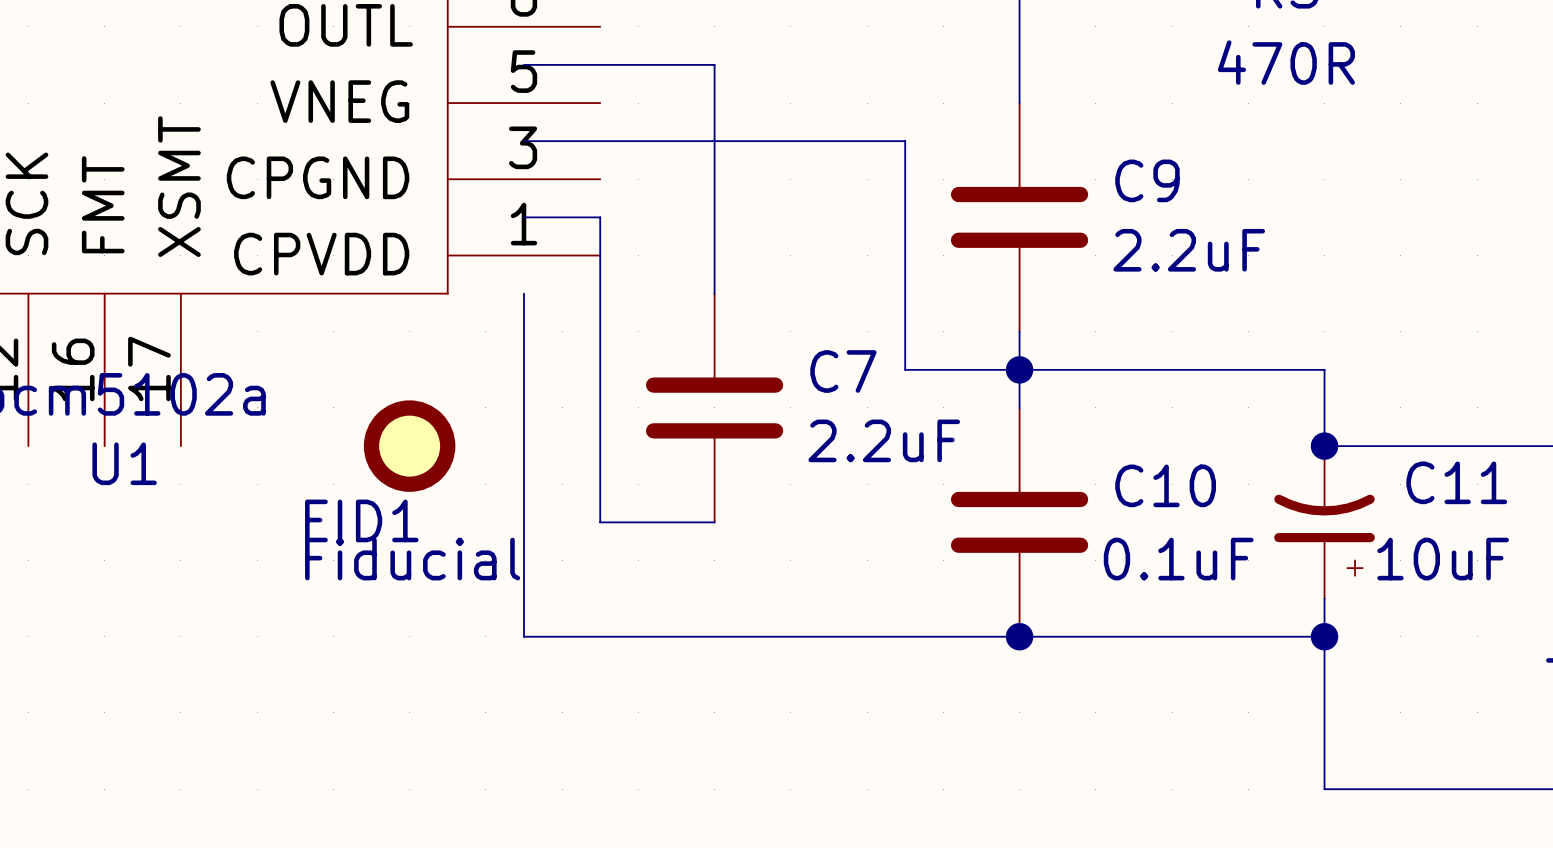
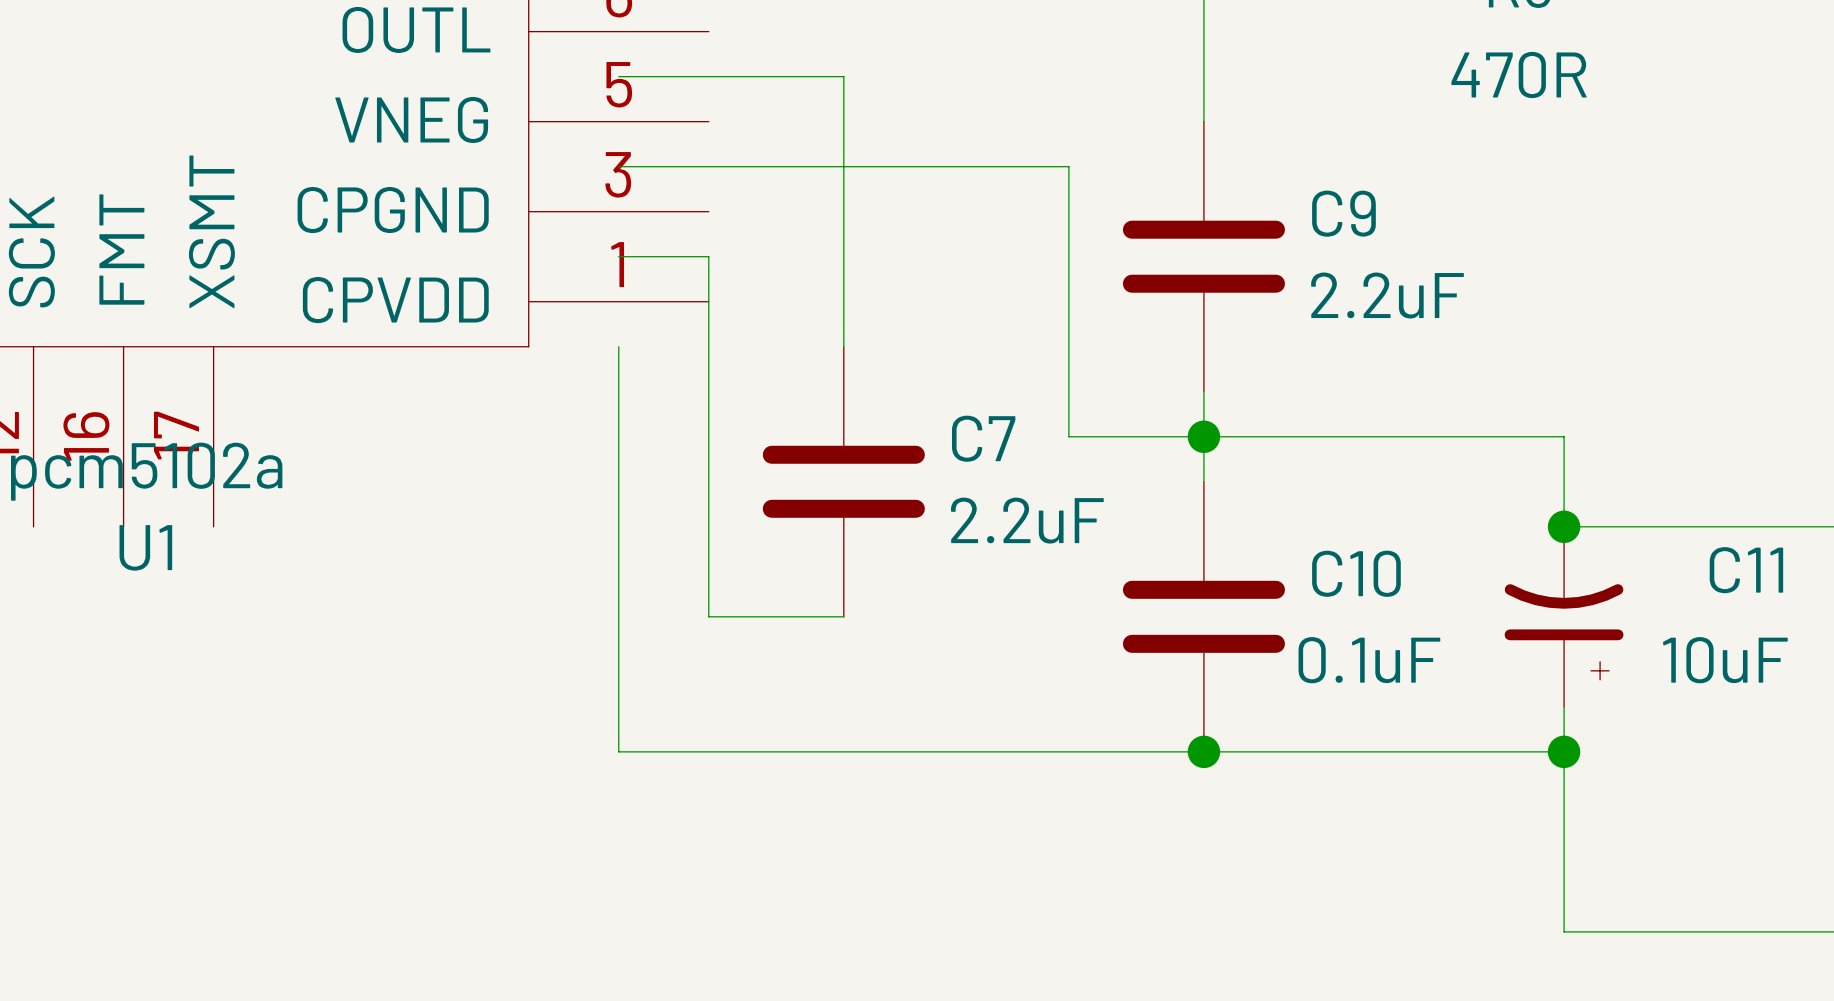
FID1: Fiducial (409, 446) -> none

